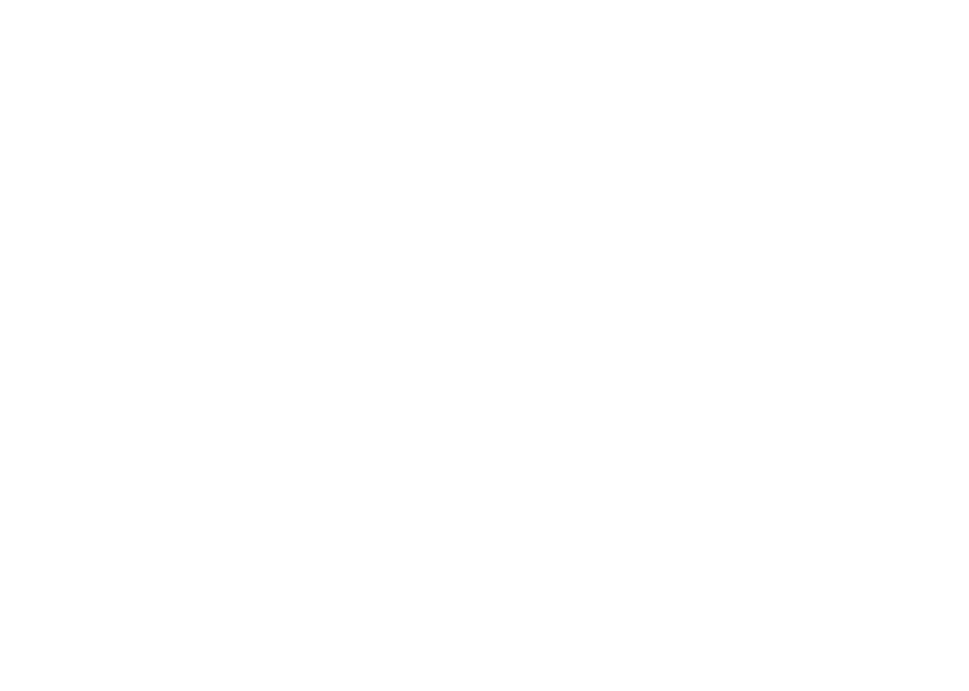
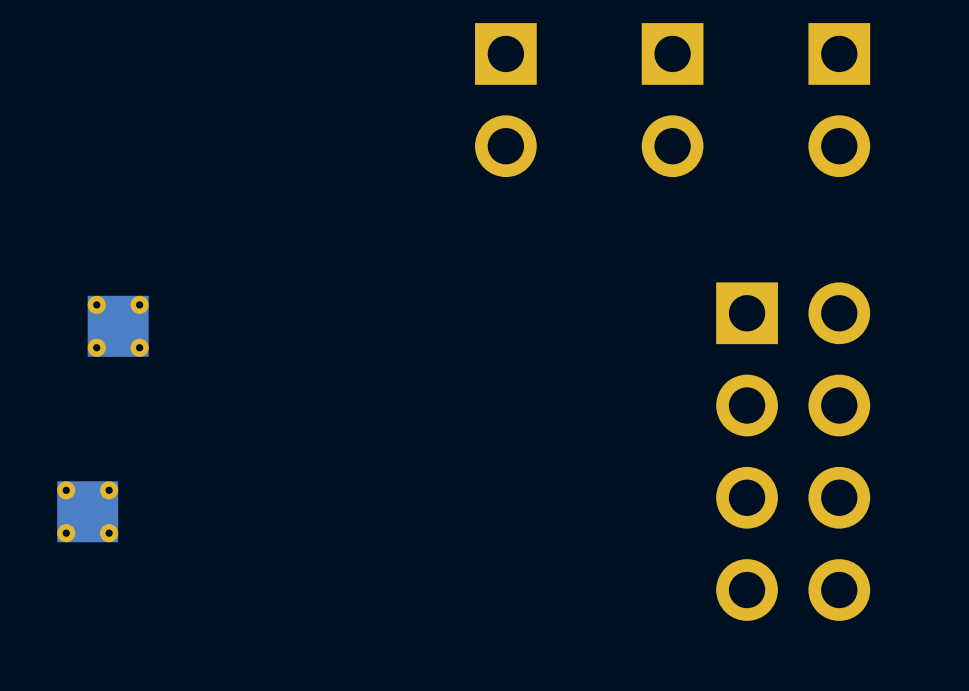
part: none -> (505, 100)
part: none -> (672, 100)
part: none -> (839, 100)
part: none -> (118, 326)
part: none -> (793, 451)
part: none -> (87, 511)

